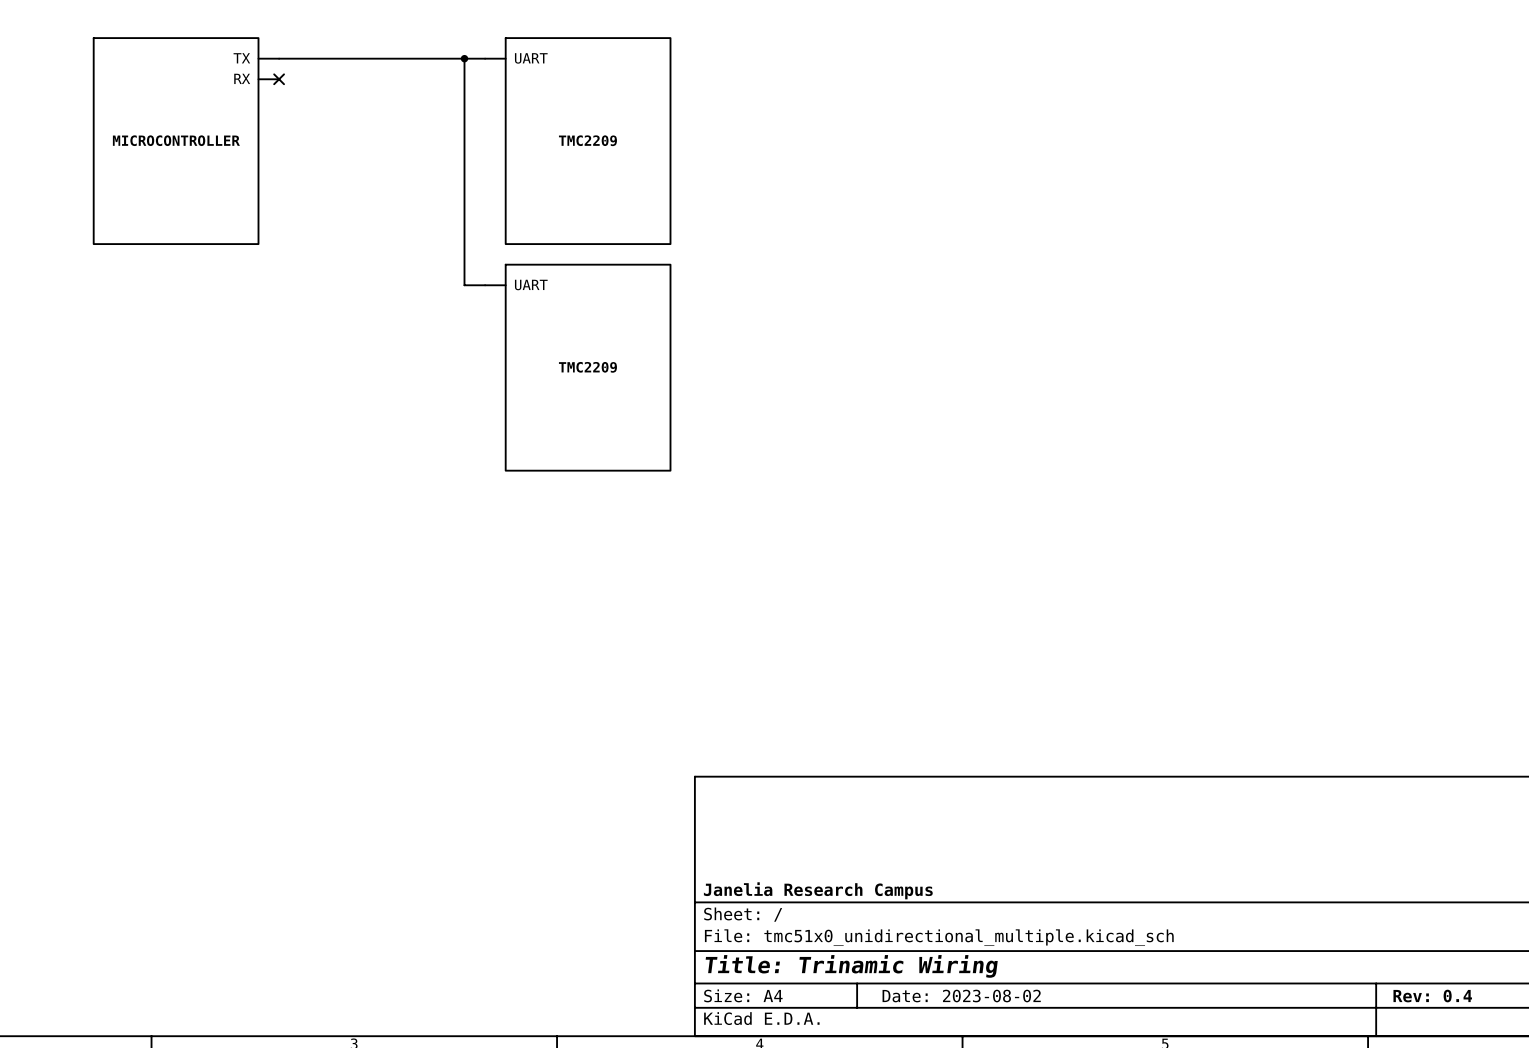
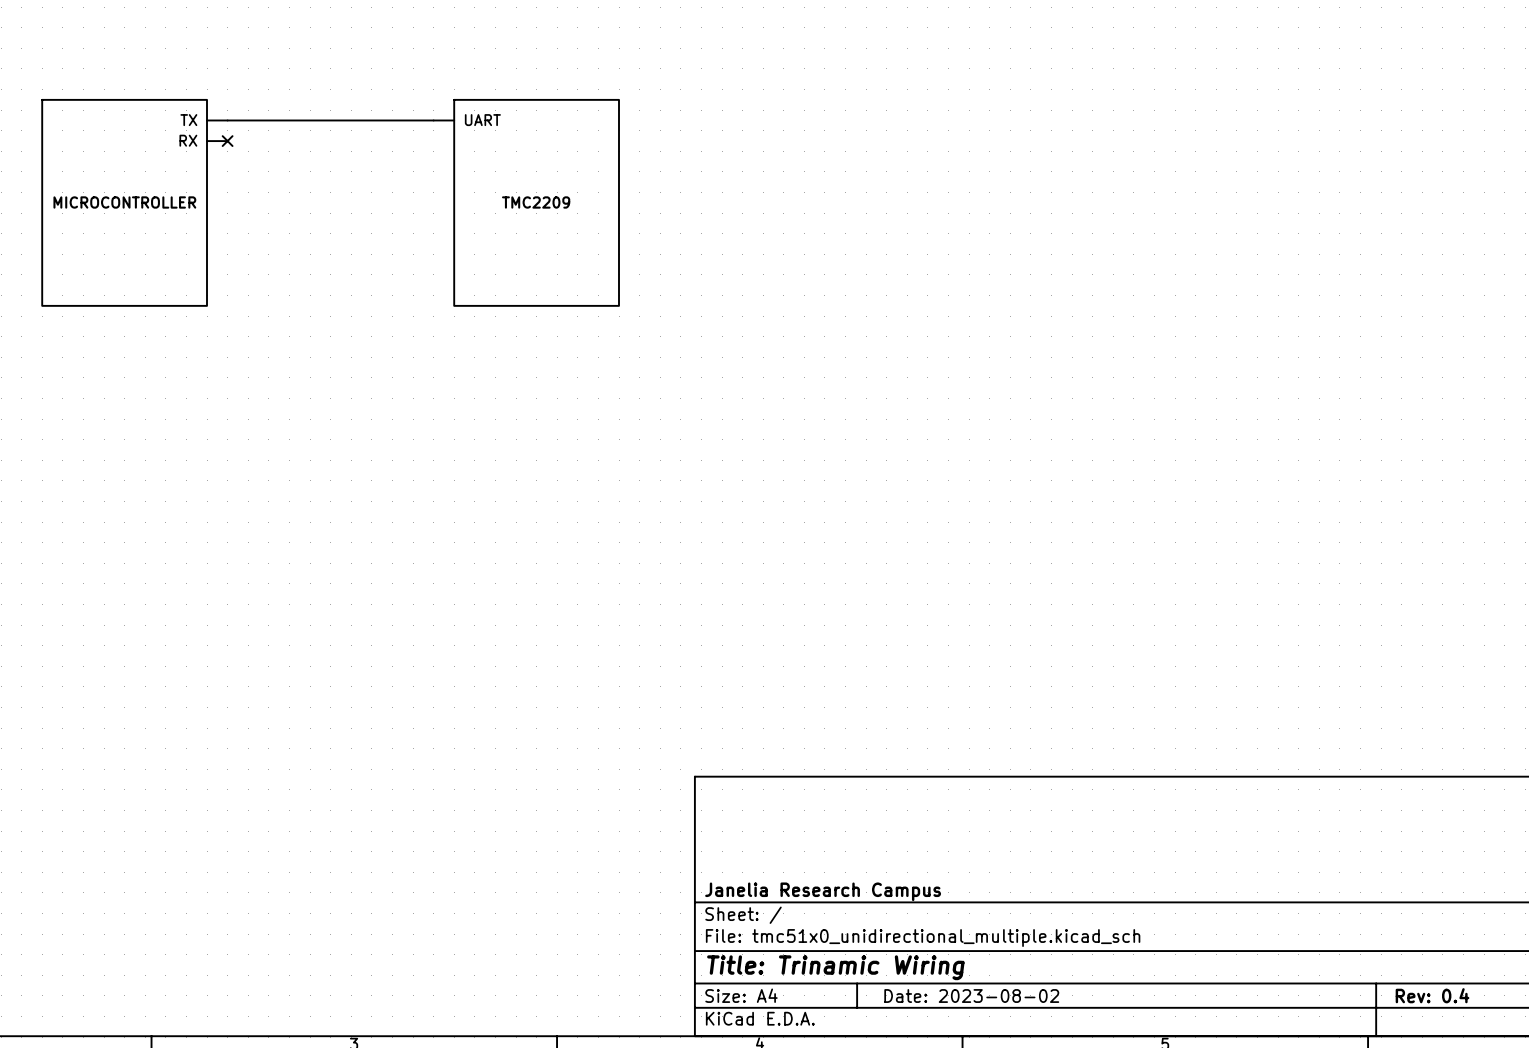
wire: (279, 58) (485, 58) -> (227, 120) (433, 120)
wire: (464, 58) (464, 285) (485, 285) -> none
junction: (464, 58) -> none
no-connect mark: (279, 79) -> none
part position: (186, 141) -> (134, 202)
no-connect mark: none -> (227, 141)
part position: (577, 141) -> (526, 202)
part: (577, 367) -> none

